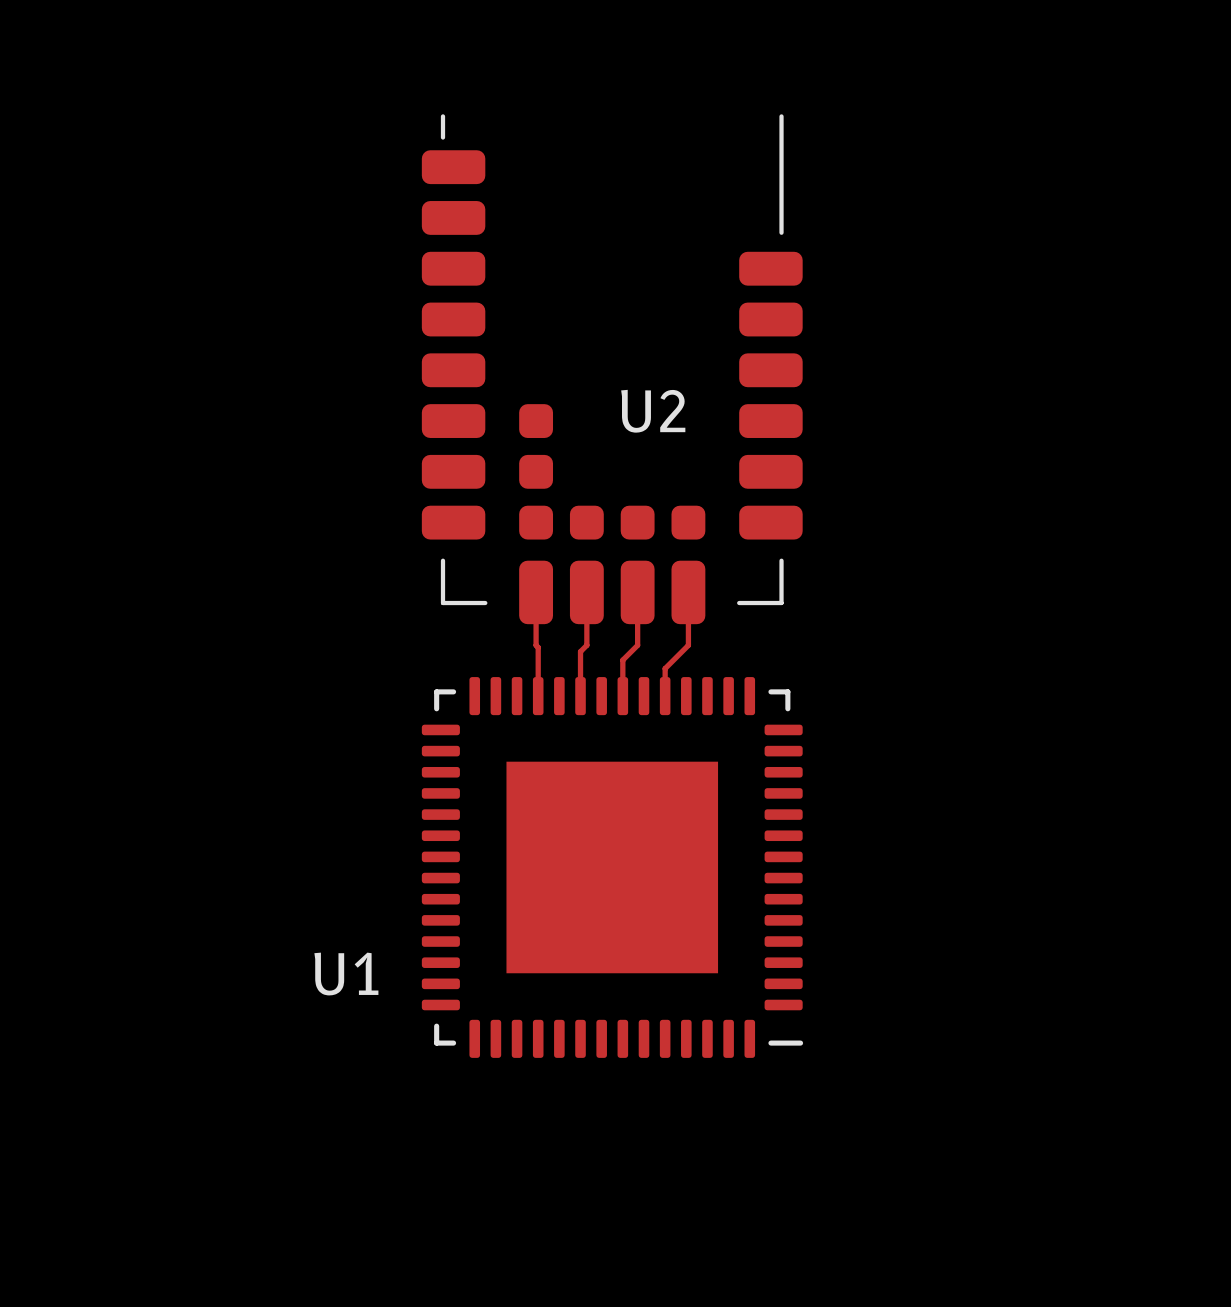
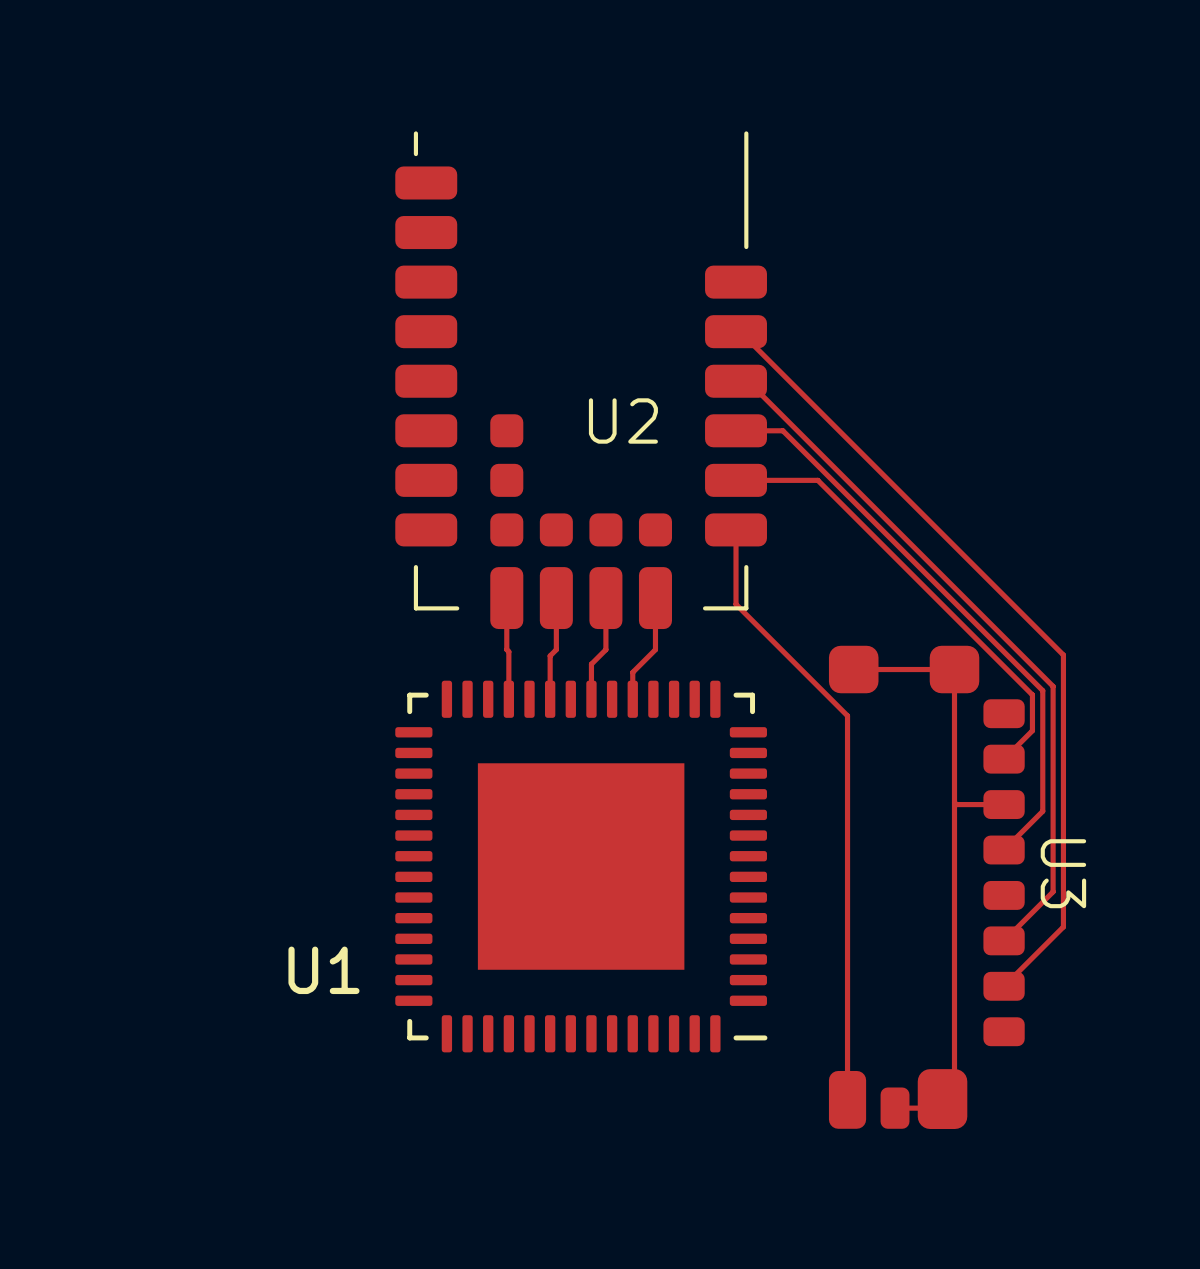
top track: none -> (736, 331) (740, 331) (1063, 655) (1063, 926) (1004, 986)
top track: none -> (736, 381) (747, 381) (1053, 686) (1053, 891) (1004, 940)
top track: none -> (736, 430) (782, 430) (1042, 690) (1042, 811) (1004, 850)
top track: none -> (736, 480) (817, 480) (1032, 694) (1032, 730) (1004, 759)
top track: none -> (736, 529) (736, 604) (847, 715) (847, 1099)
top track: none -> (853, 669) (954, 669) (954, 1087) (933, 1108) (895, 1108)
top track: none -> (954, 802) (956, 804) (1004, 804)
U3: none -> (926, 887)

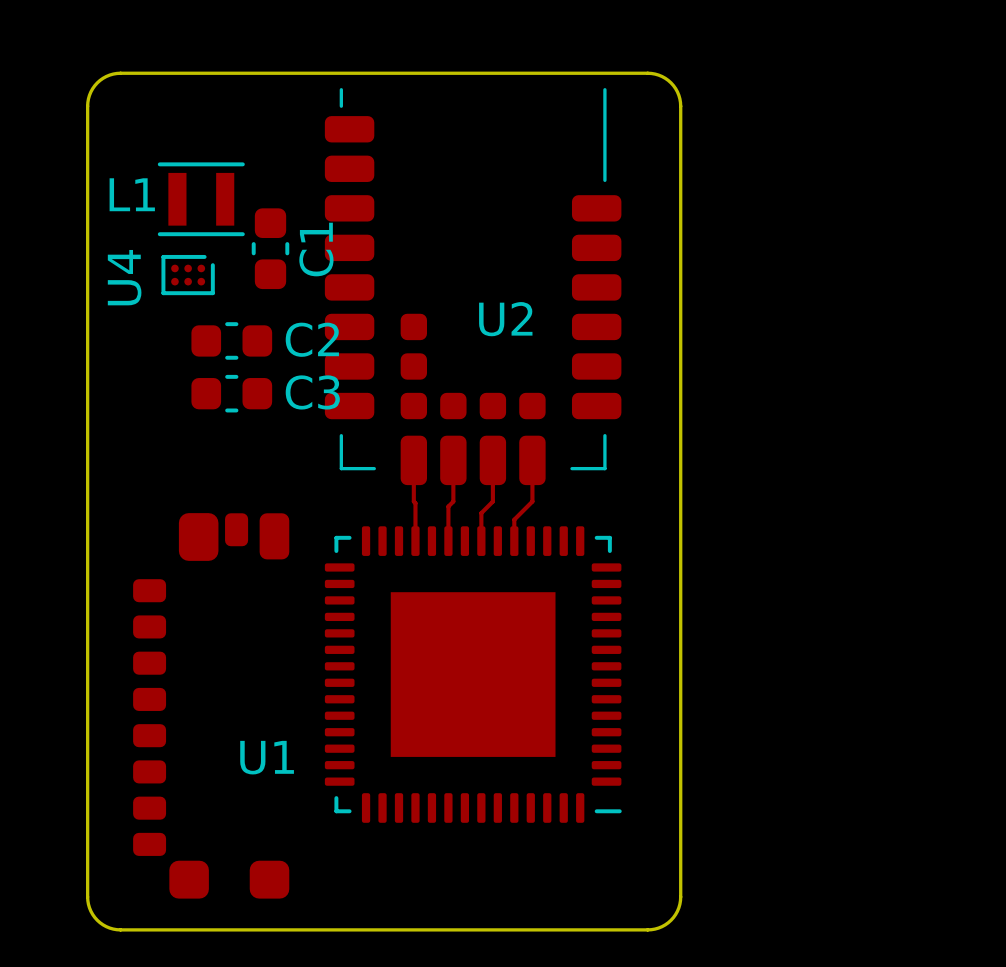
board edge: none -> (120, 73) (647, 73) (662, 76) (675, 88) (680, 106) (680, 896) (677, 911) (665, 924) (647, 929) (120, 929) (106, 926) (92, 914) (87, 896) (87, 106) (90, 91) (97, 82) (106, 76) (120, 73)
L1: none -> (201, 199)
top track: (736, 331) (740, 331) (1063, 655) (1063, 926) (1004, 986) -> none
C1: none -> (270, 248)
U4: none -> (188, 275)
top track: (736, 381) (747, 381) (1053, 686) (1053, 891) (1004, 940) -> none
top track: (736, 430) (782, 430) (1042, 690) (1042, 811) (1004, 850) -> none
C2: none -> (231, 340)
top track: (736, 480) (817, 480) (1032, 694) (1032, 730) (1004, 759) -> none
C3: none -> (231, 393)
top track: (736, 529) (736, 604) (847, 715) (847, 1099) -> none
top track: (853, 669) (954, 669) (954, 1087) (933, 1108) (895, 1108) -> none
top track: (954, 802) (956, 804) (1004, 804) -> none
U3: (926, 887) -> none
part: none -> (211, 705)

